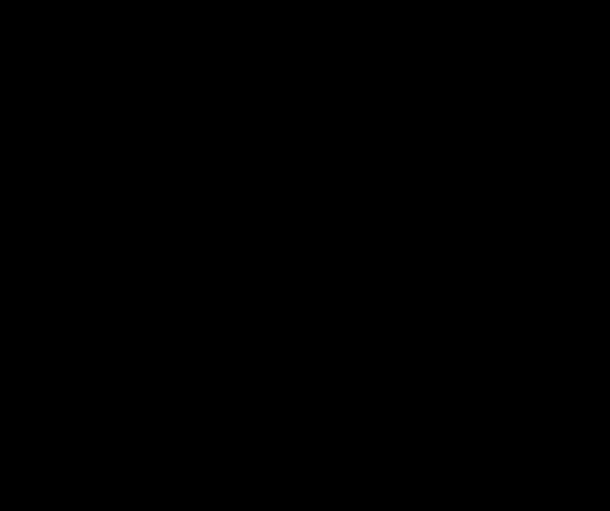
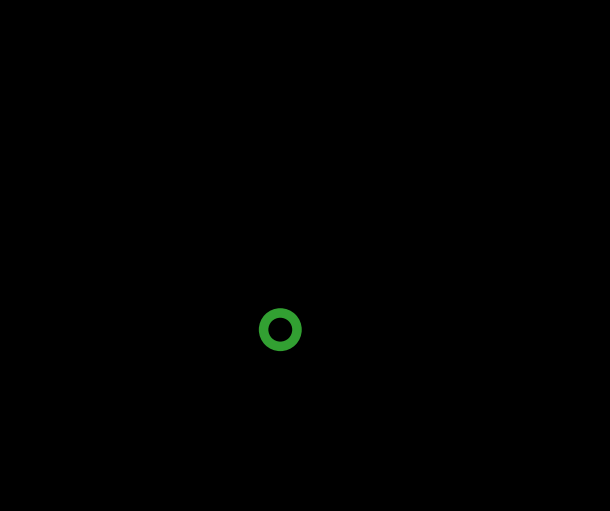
via: none -> (280, 329)

